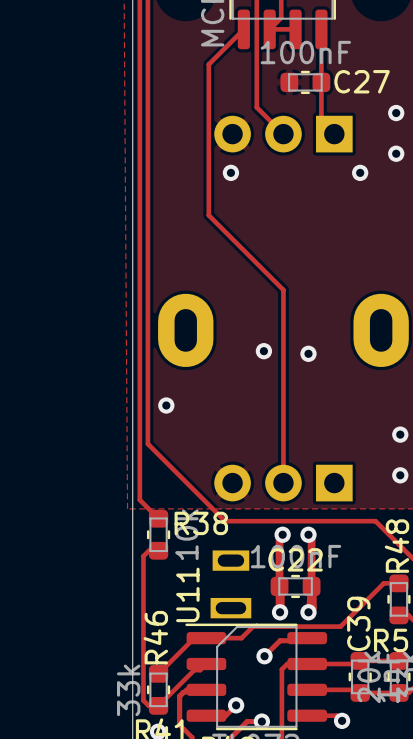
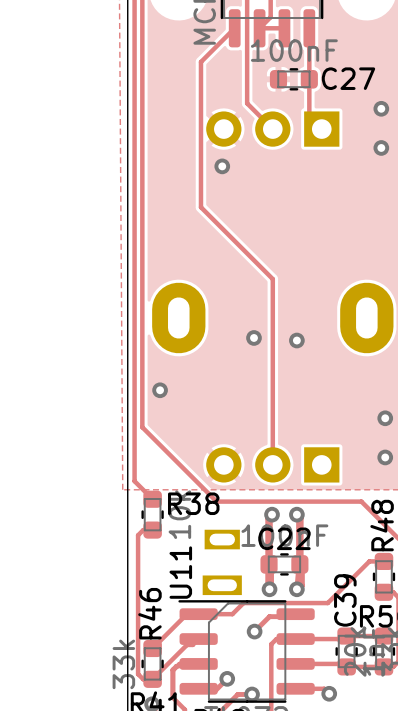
via: (360, 172) -> none

